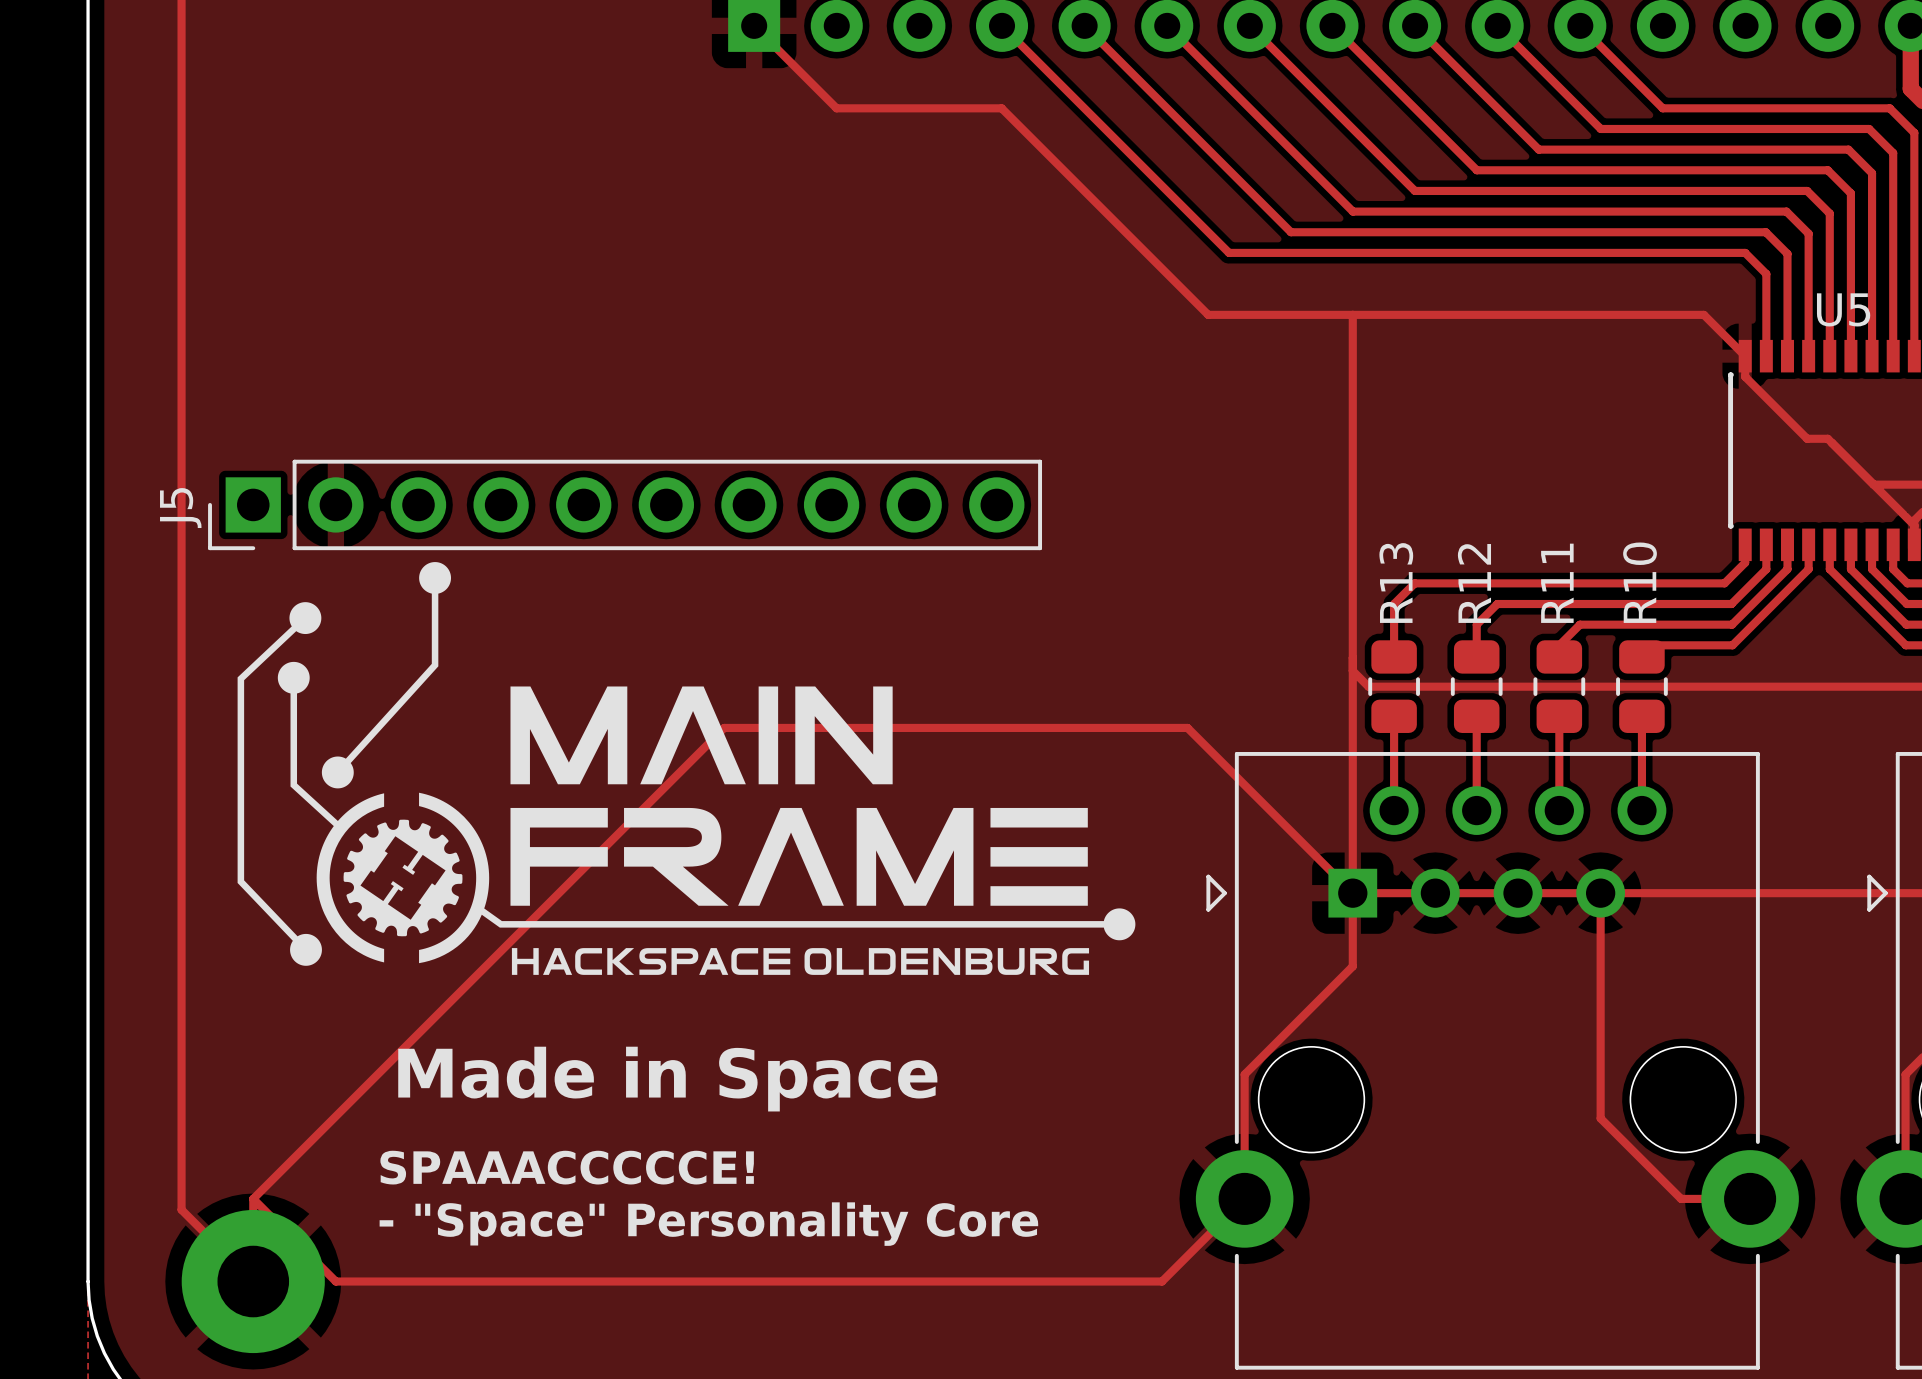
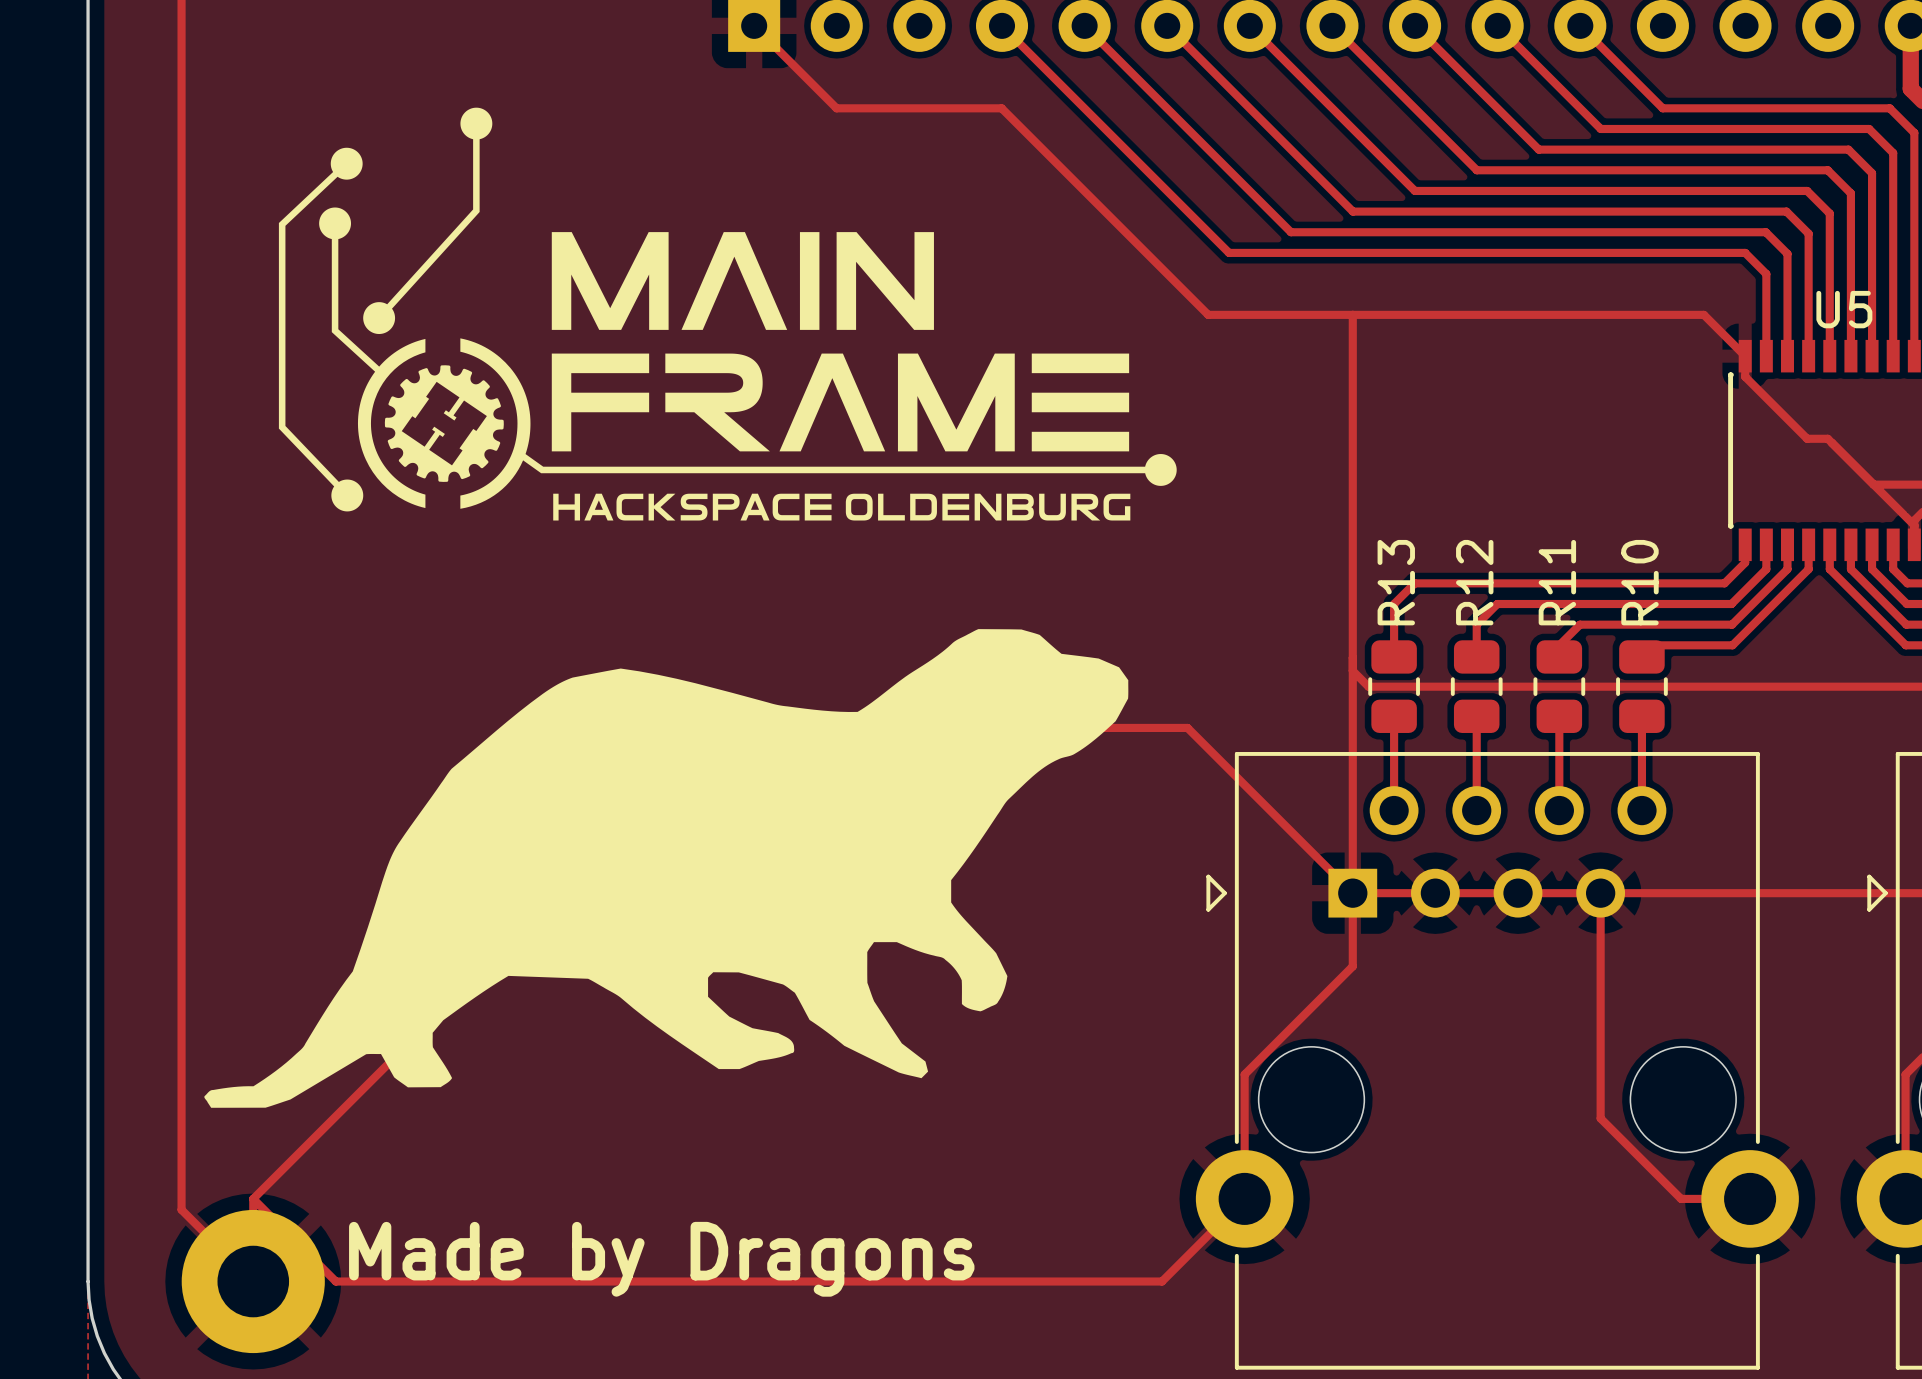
J5: (625, 504) -> none
drawing: none -> [204, 629, 1129, 1108]
drawing position: (686, 768) -> (727, 314)
text: Made in Space (667, 1079) -> none
text: SPAAACCCCCE! (567, 1167) -> none
text: - "Space" Personality Core (708, 1224) -> none
text: none -> Made by Dragons (661, 1259)

